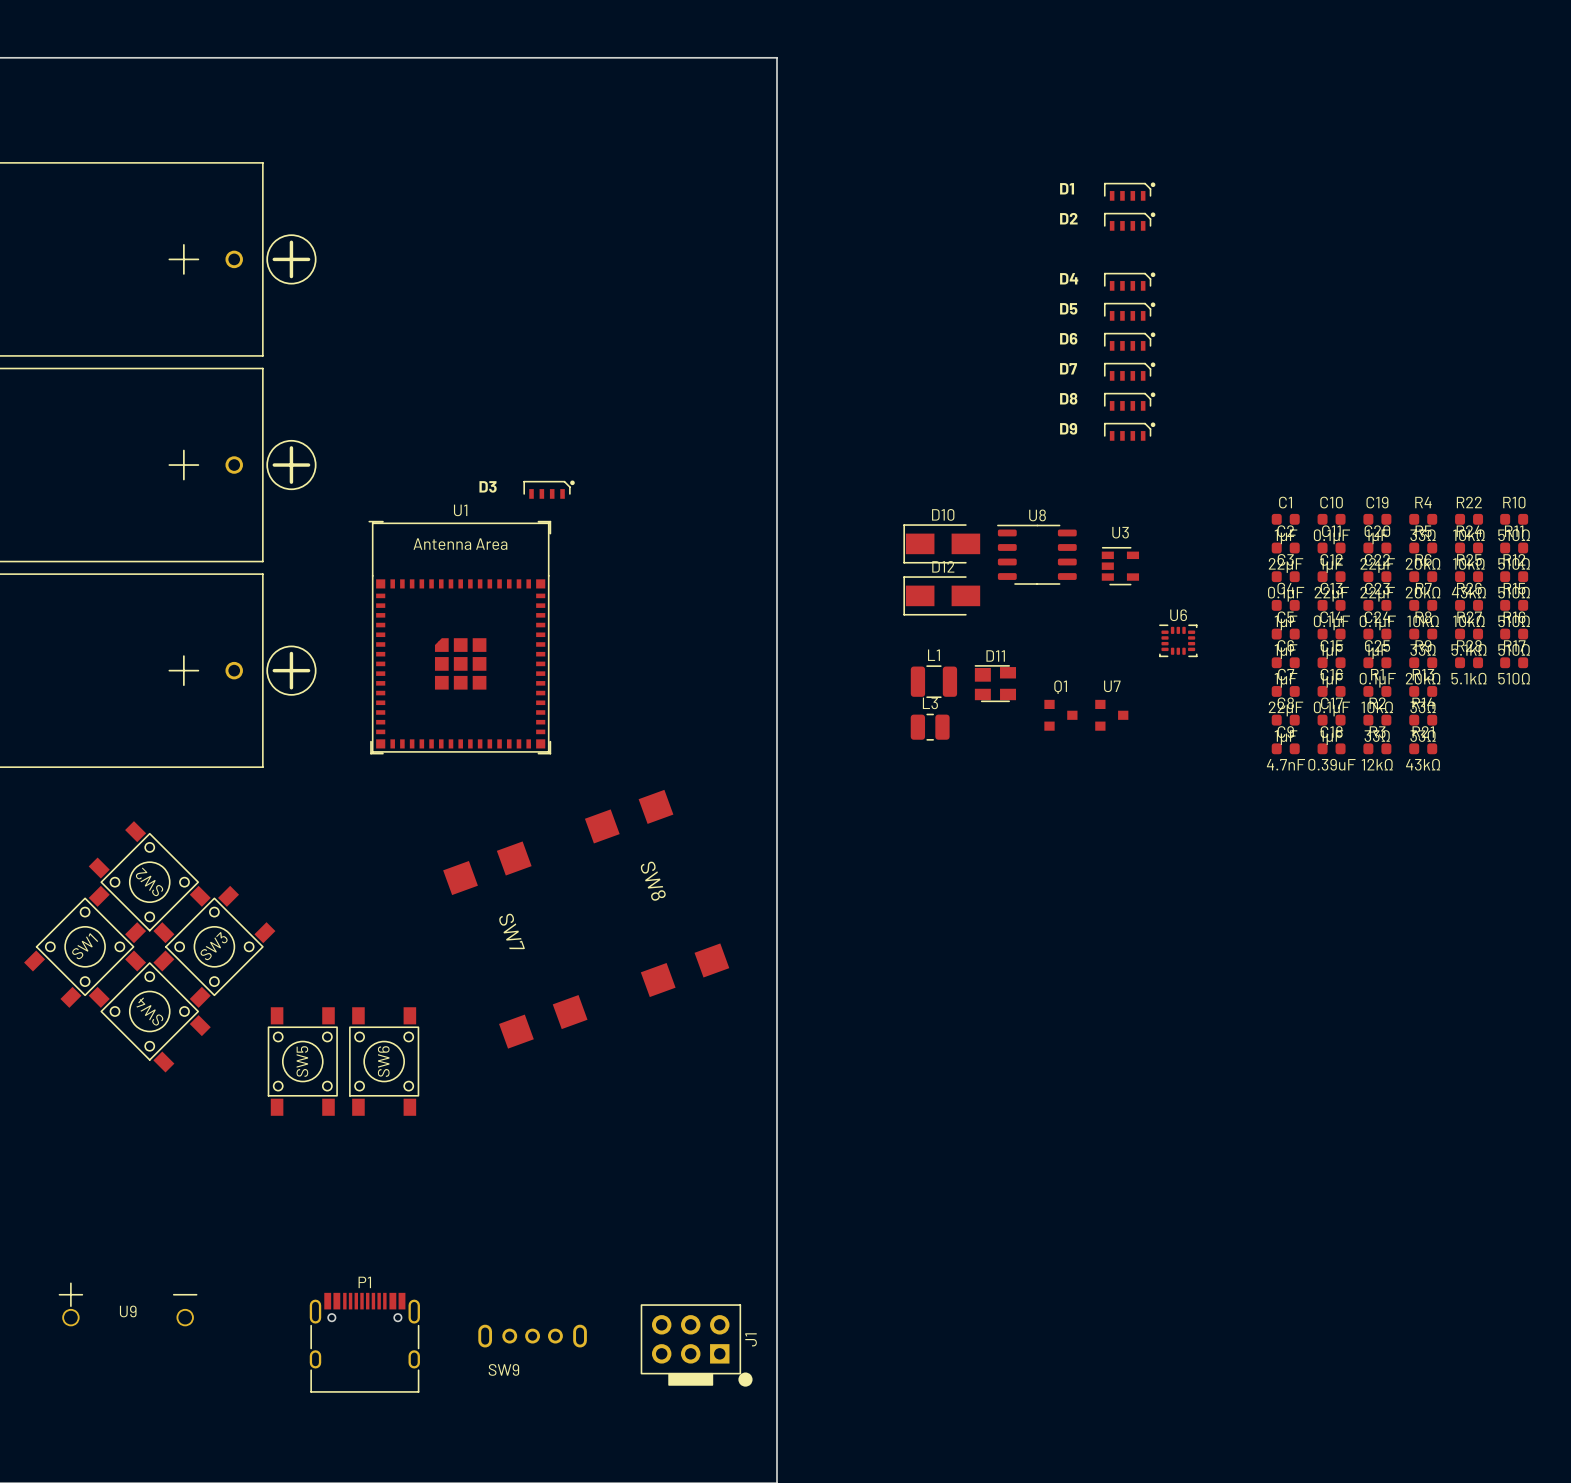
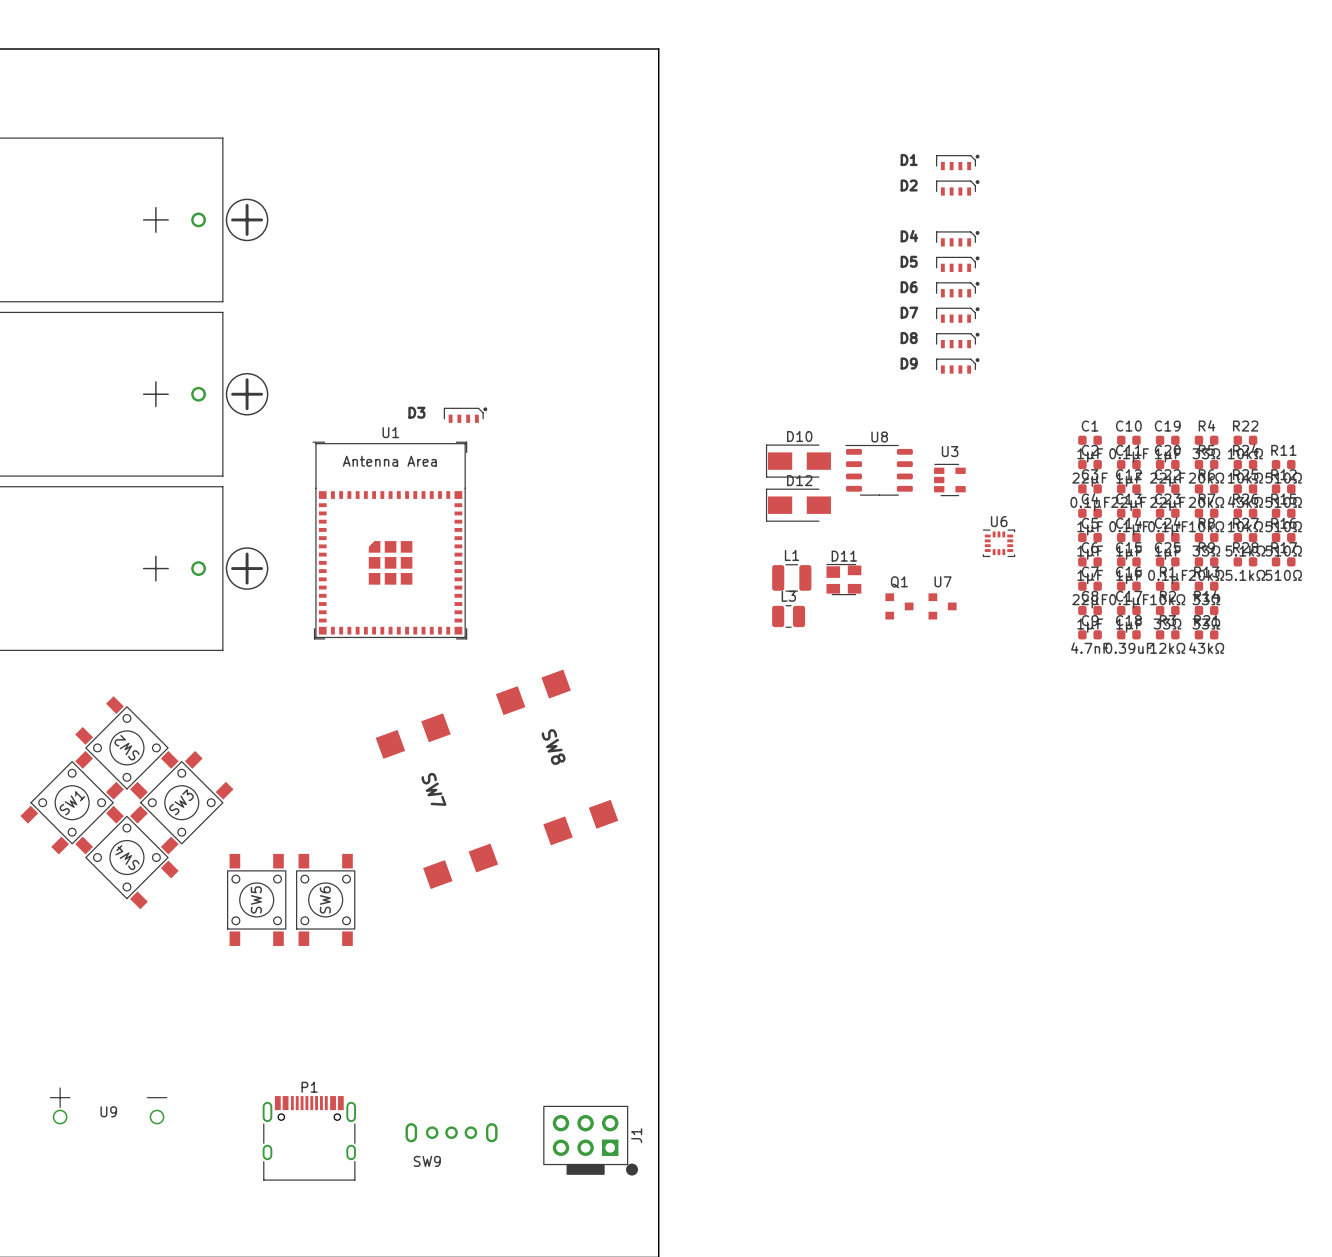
R10: 510Ω (1514, 519) -> none

